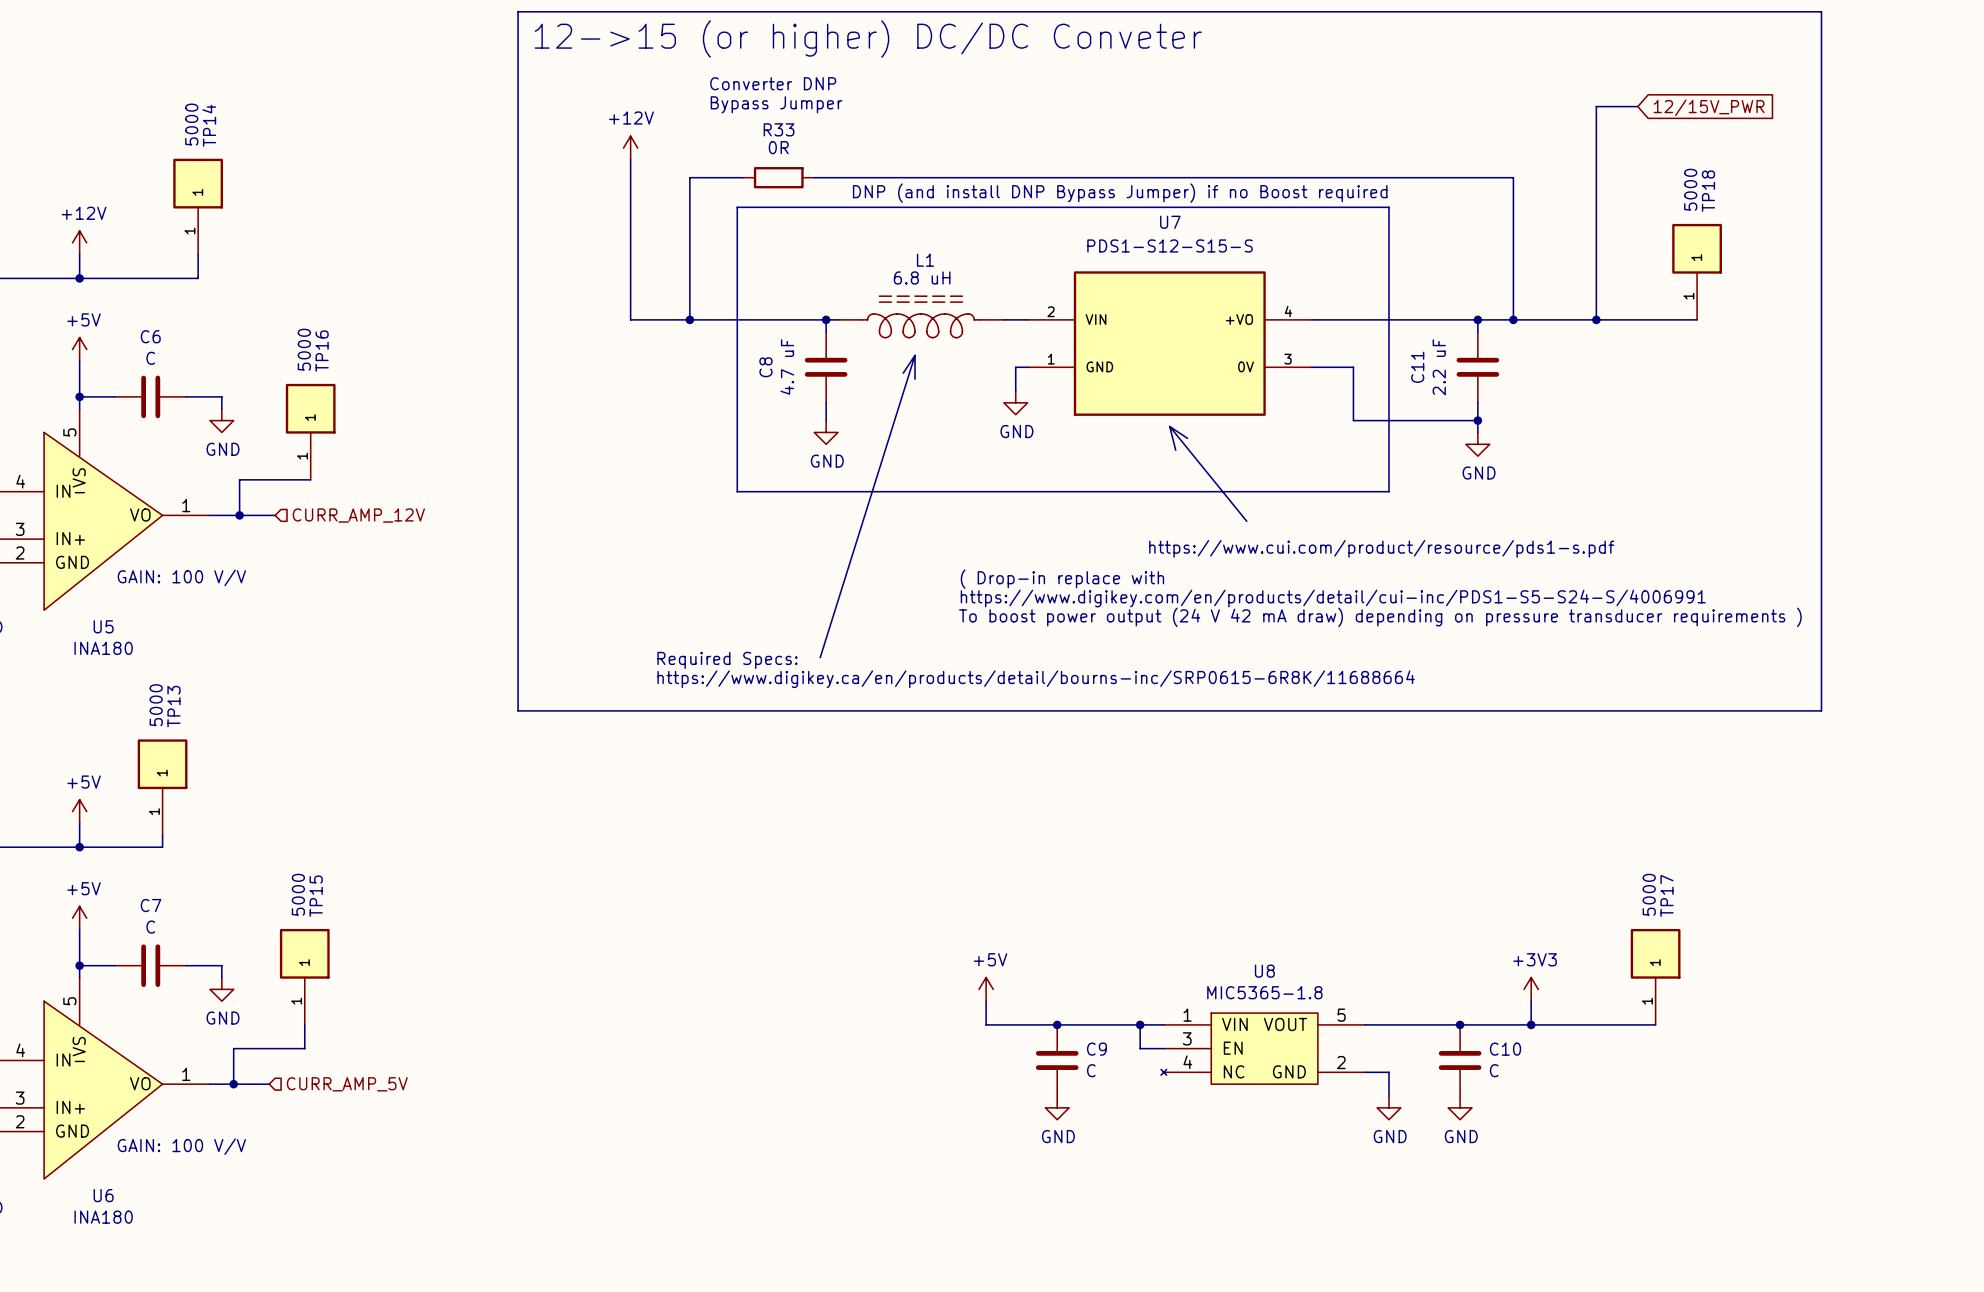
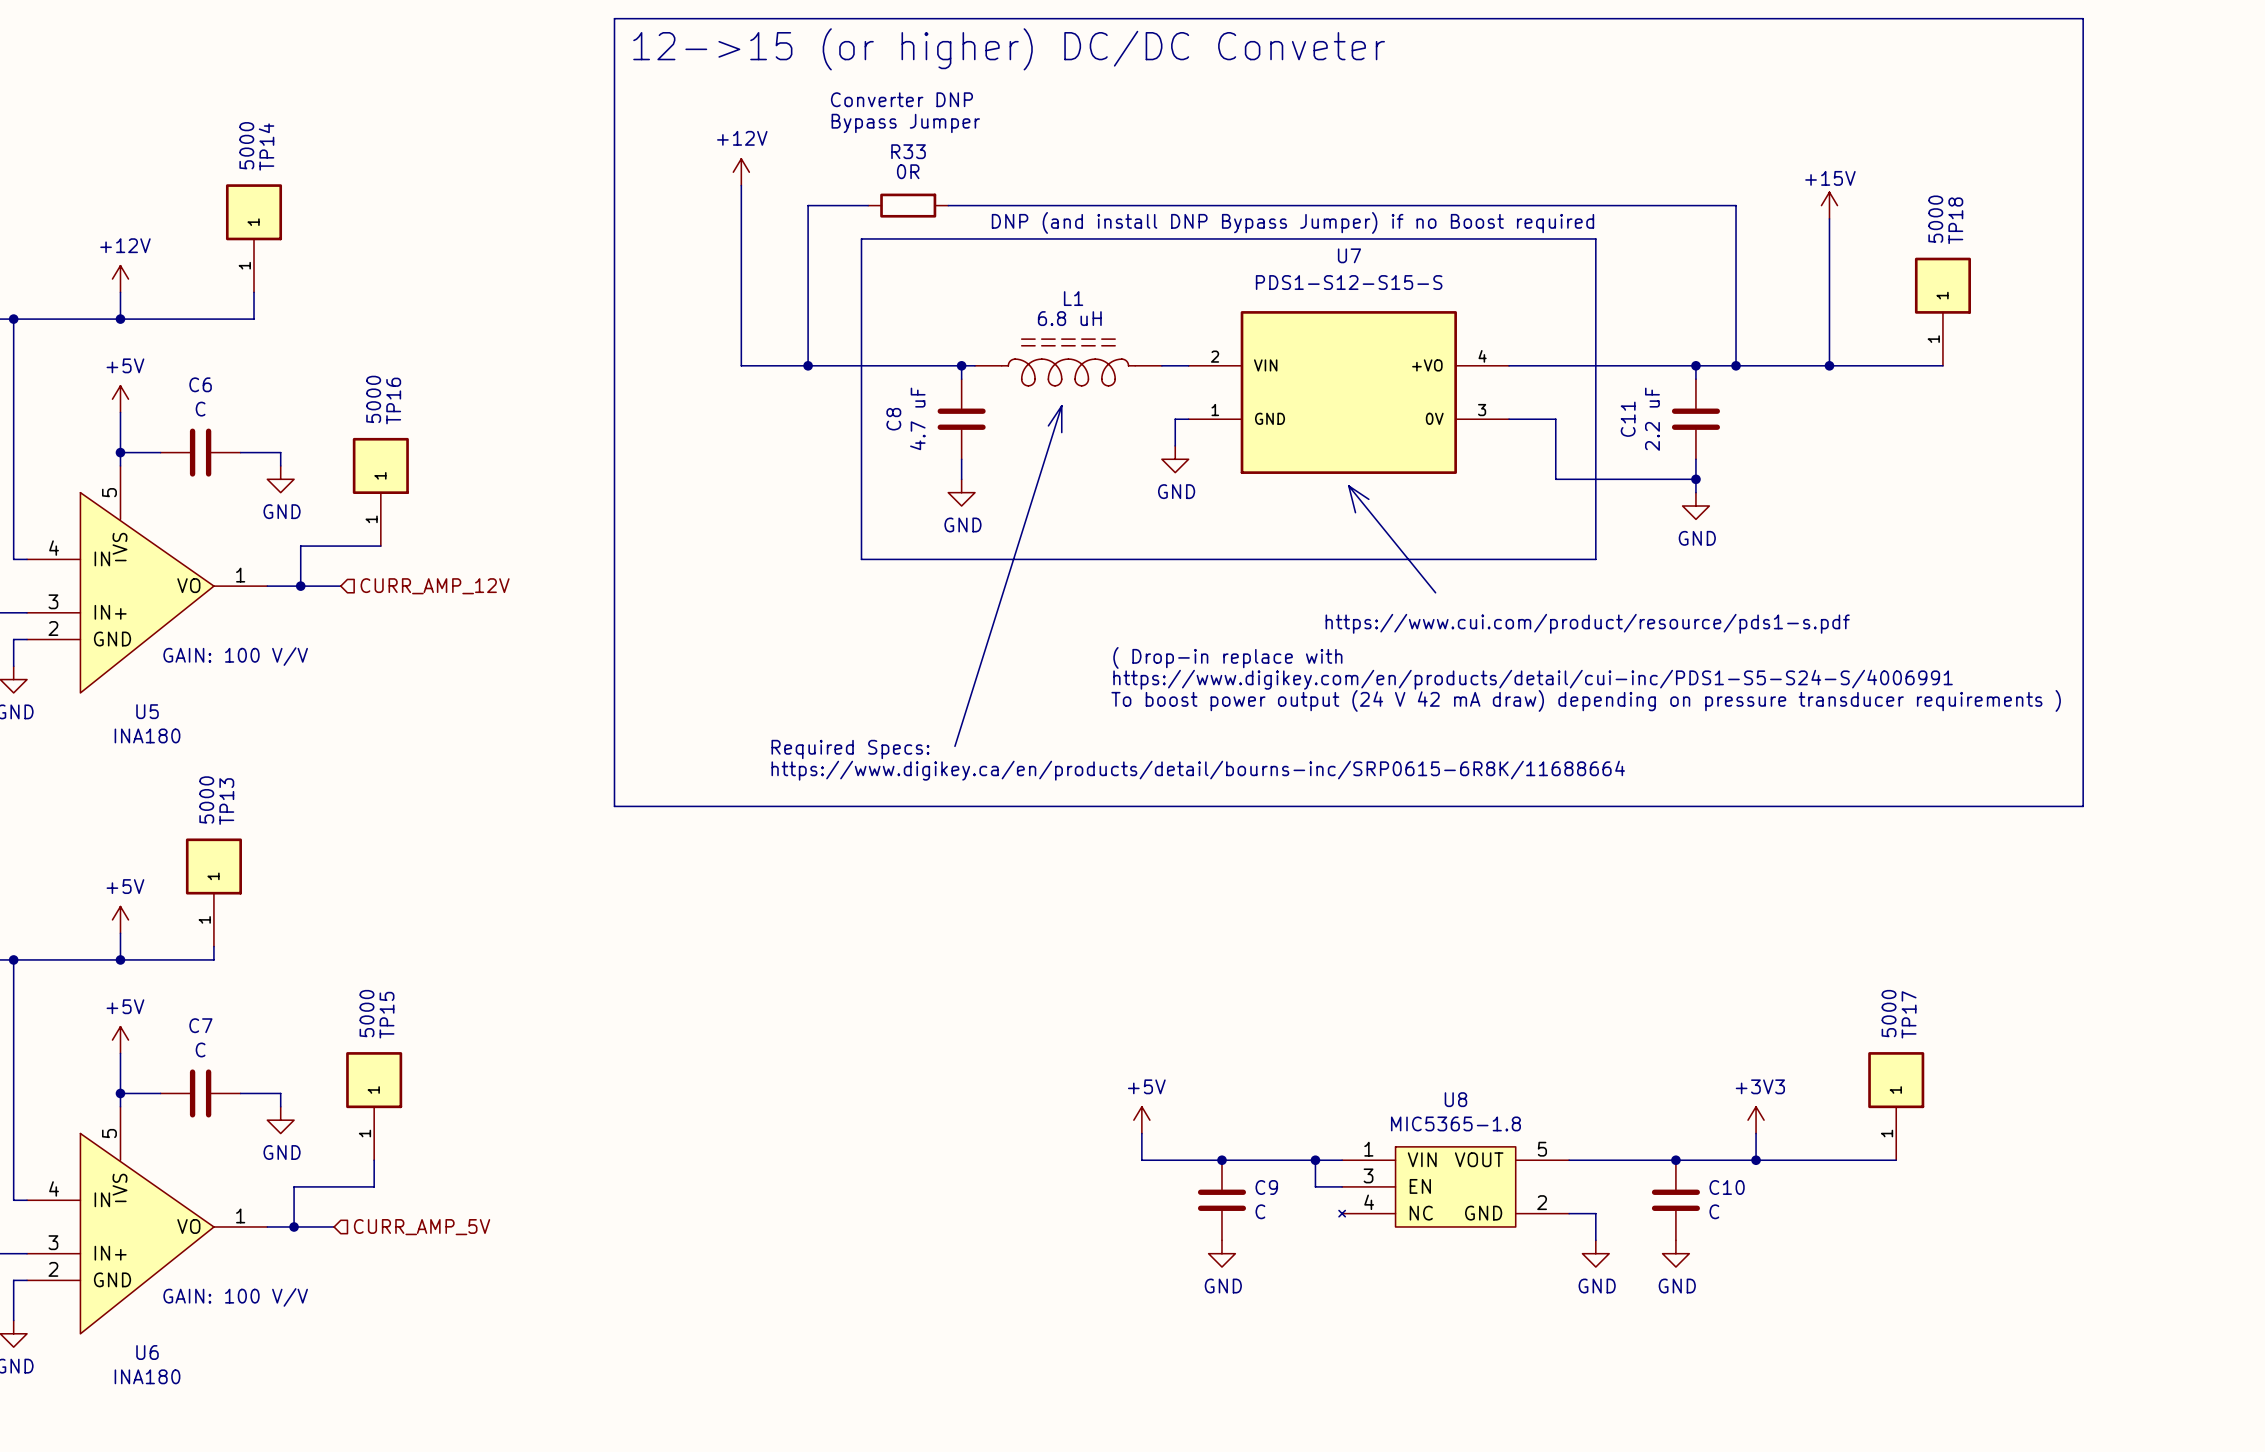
wire: (1637, 106) (1596, 106) (1596, 189) -> none
global label: 12/15V_PWR (1709, 107) -> none
power symbol: none -> +15V (1829, 205)

